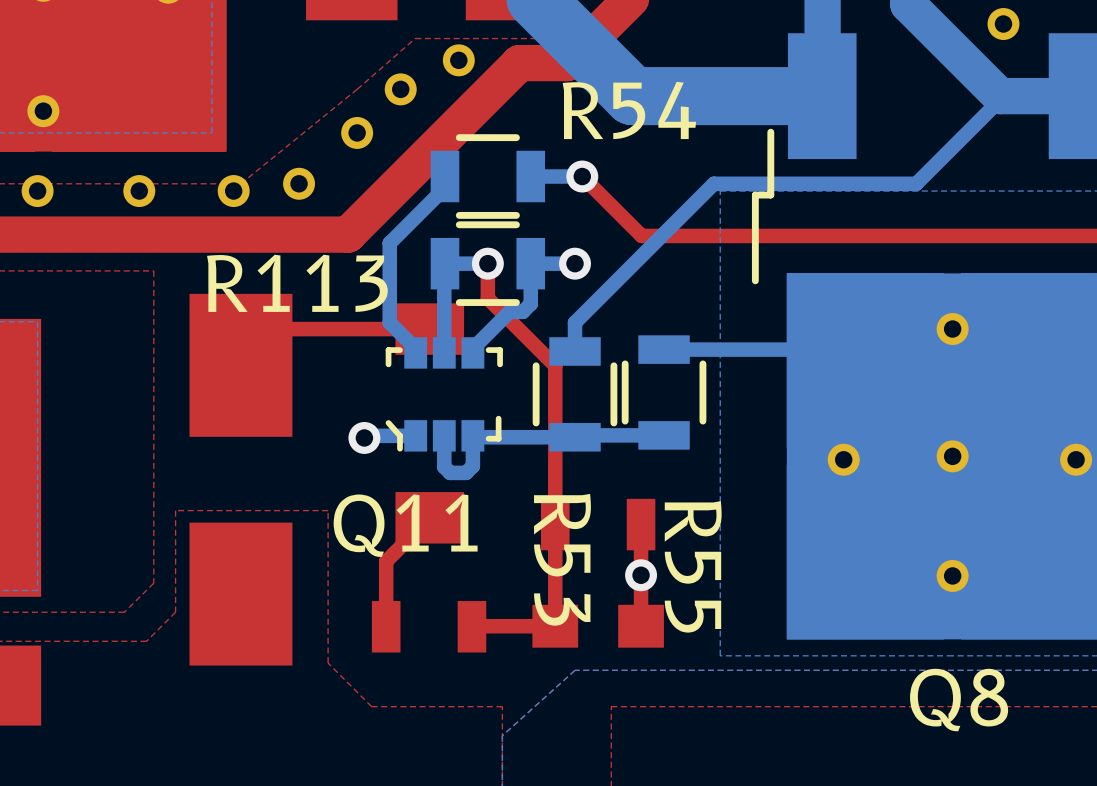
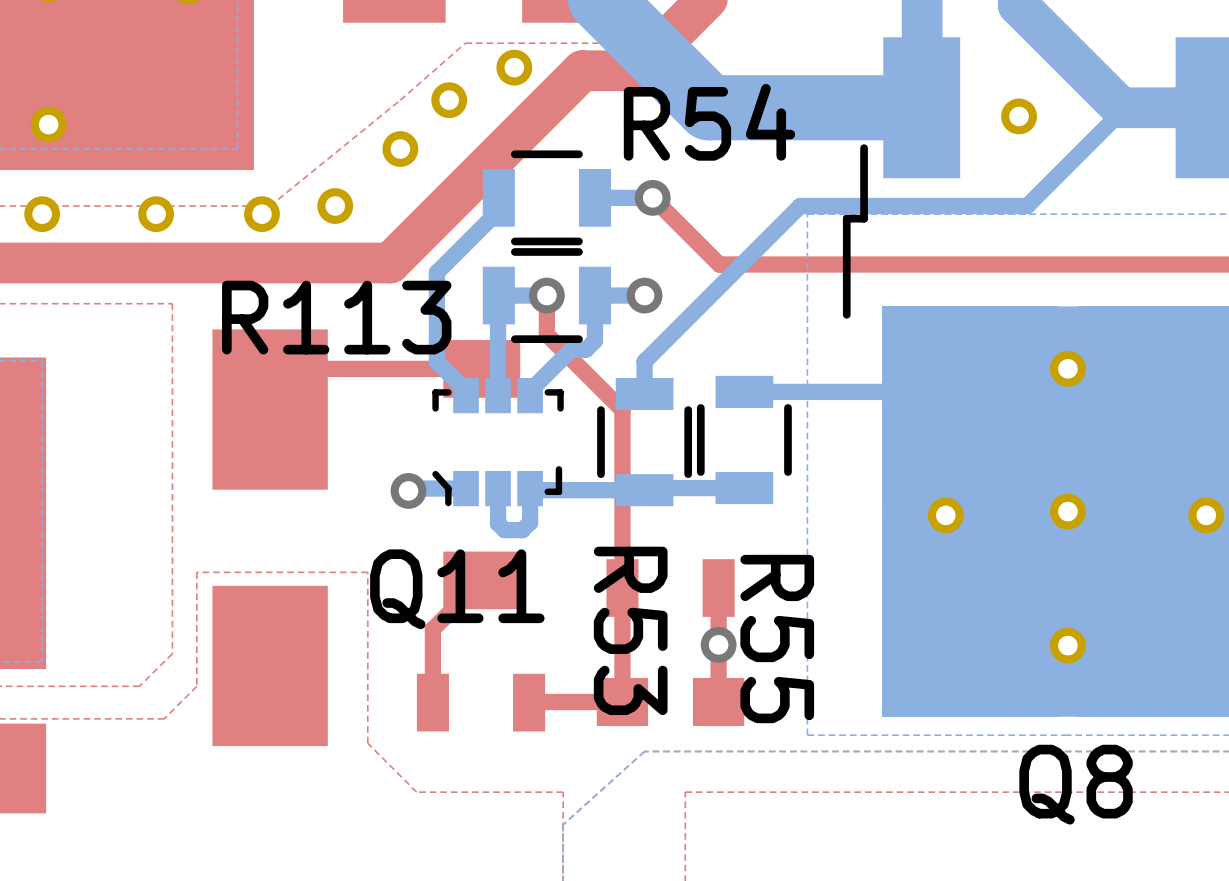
part position: (1003, 24) -> (1019, 116)

